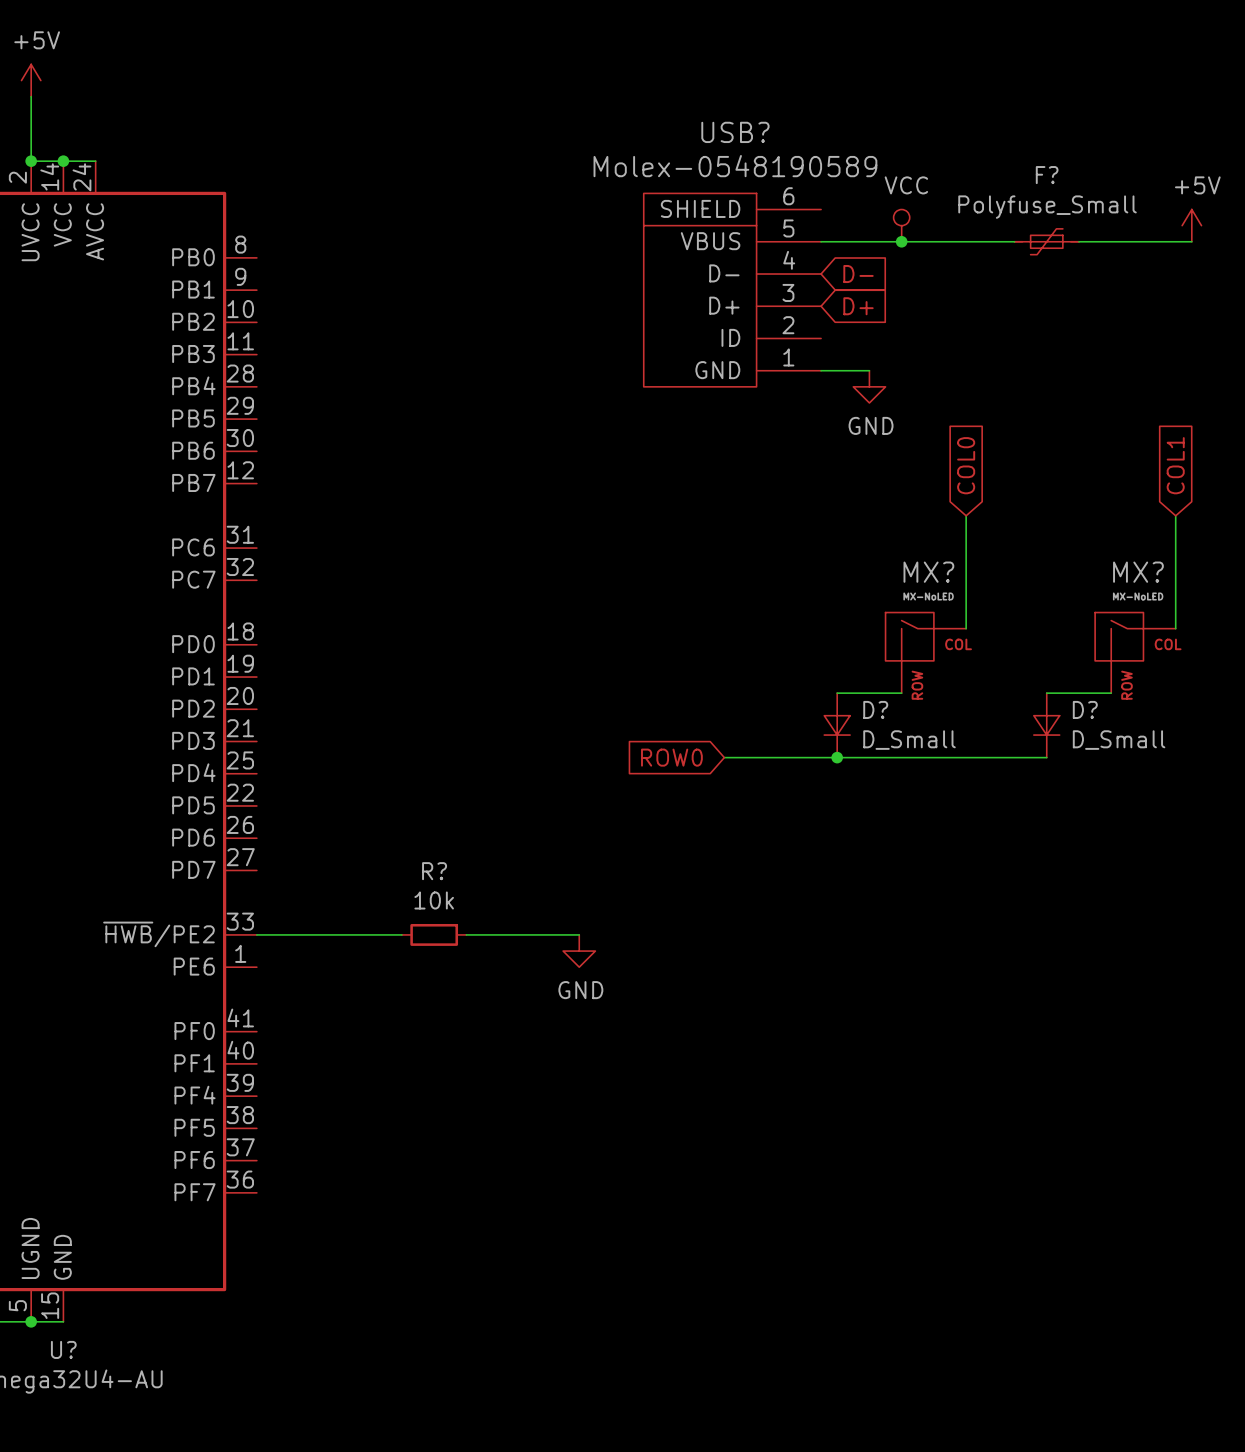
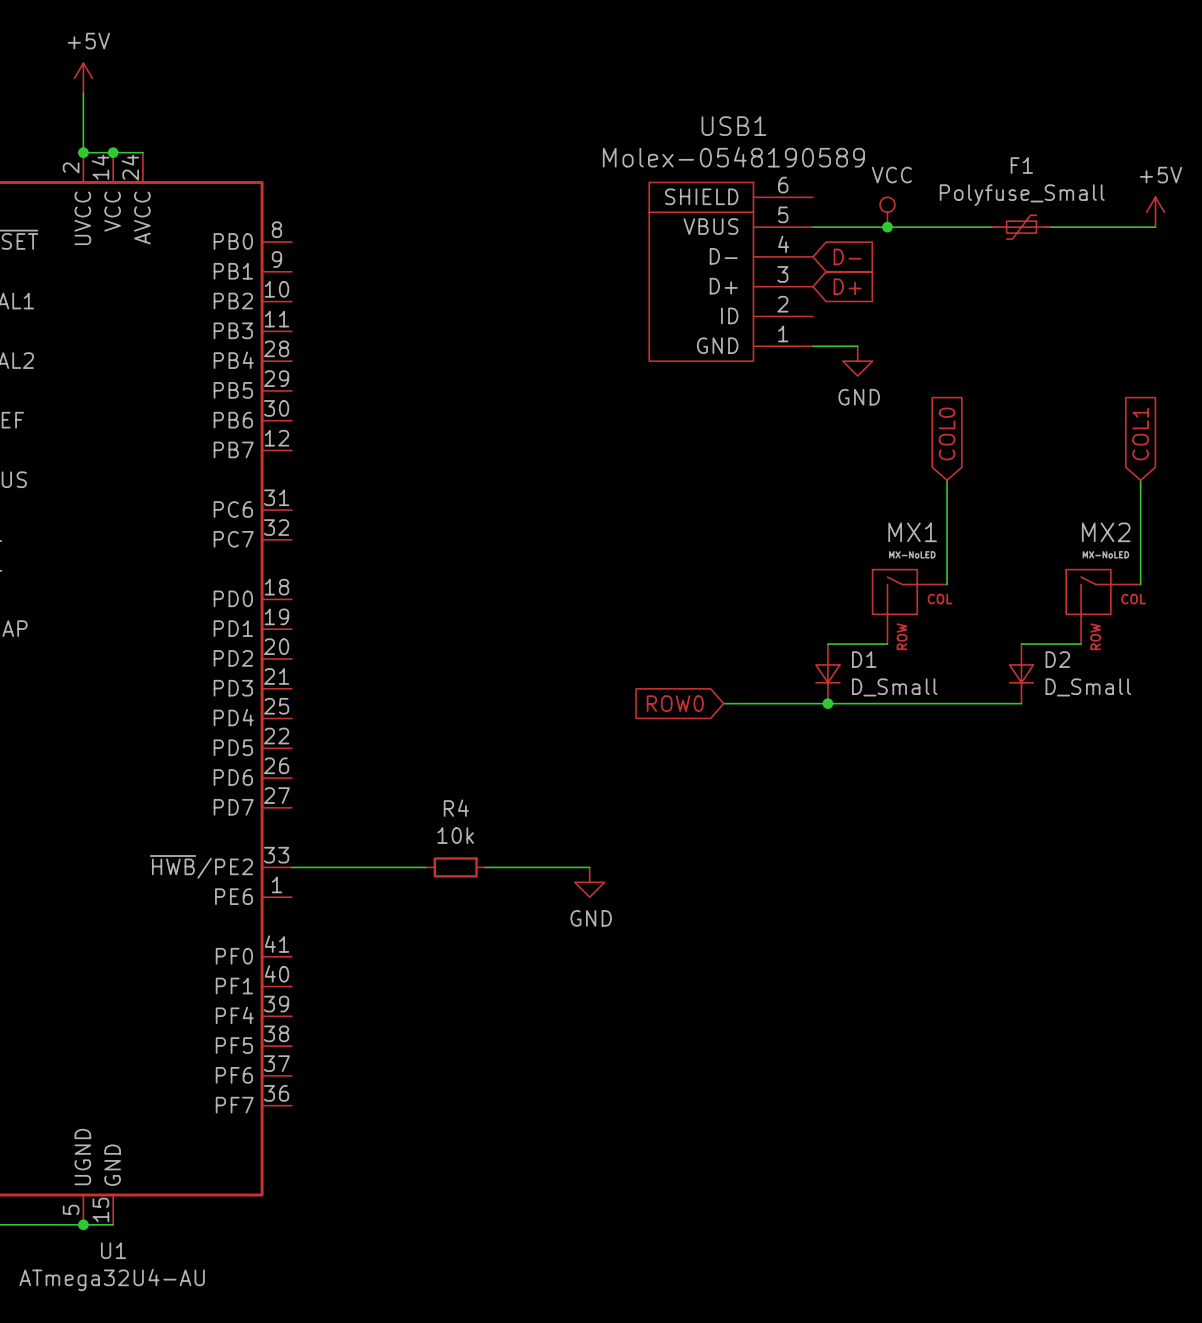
USB? name: USB? (735, 132) -> USB1 (733, 126)
F? name: F? (1047, 175) -> F1 (1021, 165)
MX? name: MX? (928, 572) -> MX1 (912, 532)
MX? name: MX? (1138, 572) -> MX2 (1106, 532)
D? name: D? (875, 709) -> D1 (864, 659)
D? name: D? (1085, 709) -> D2 (1057, 659)
R? name: R? (434, 871) -> R4 (456, 808)
U? name: U? (63, 1349) -> U1 (113, 1250)

